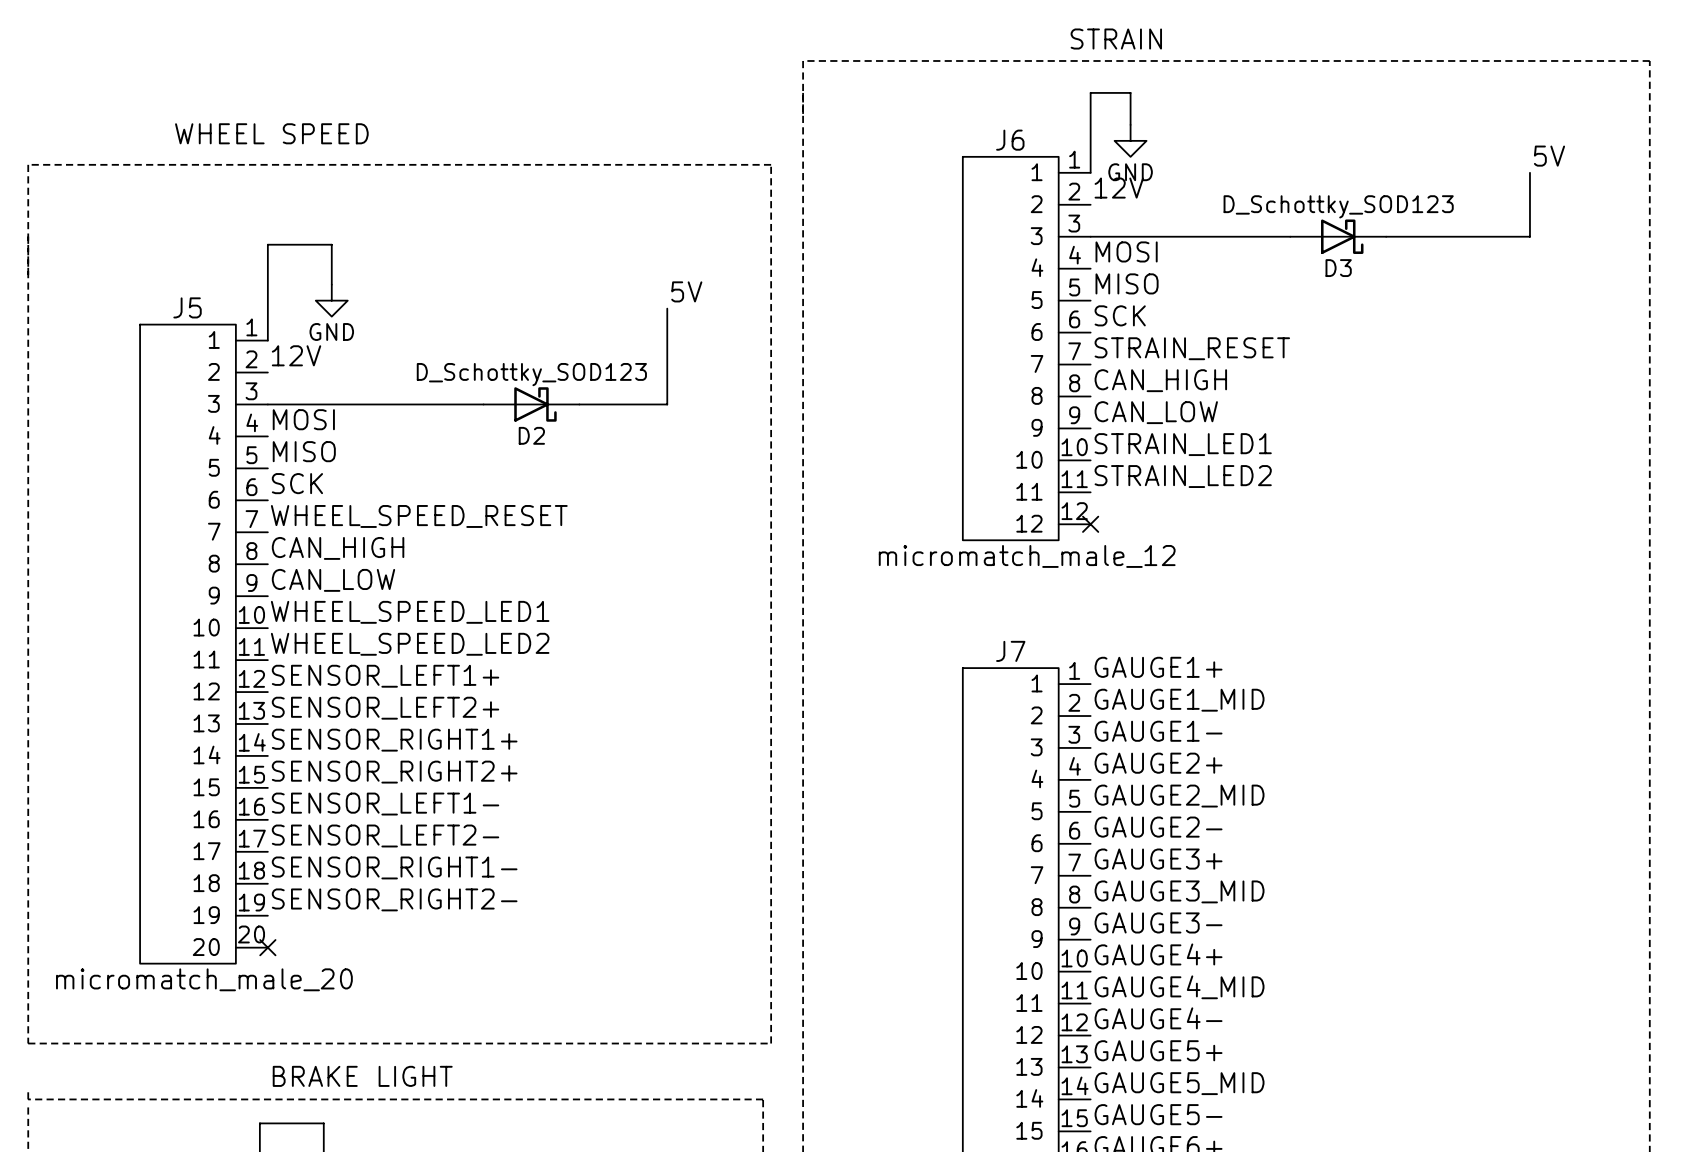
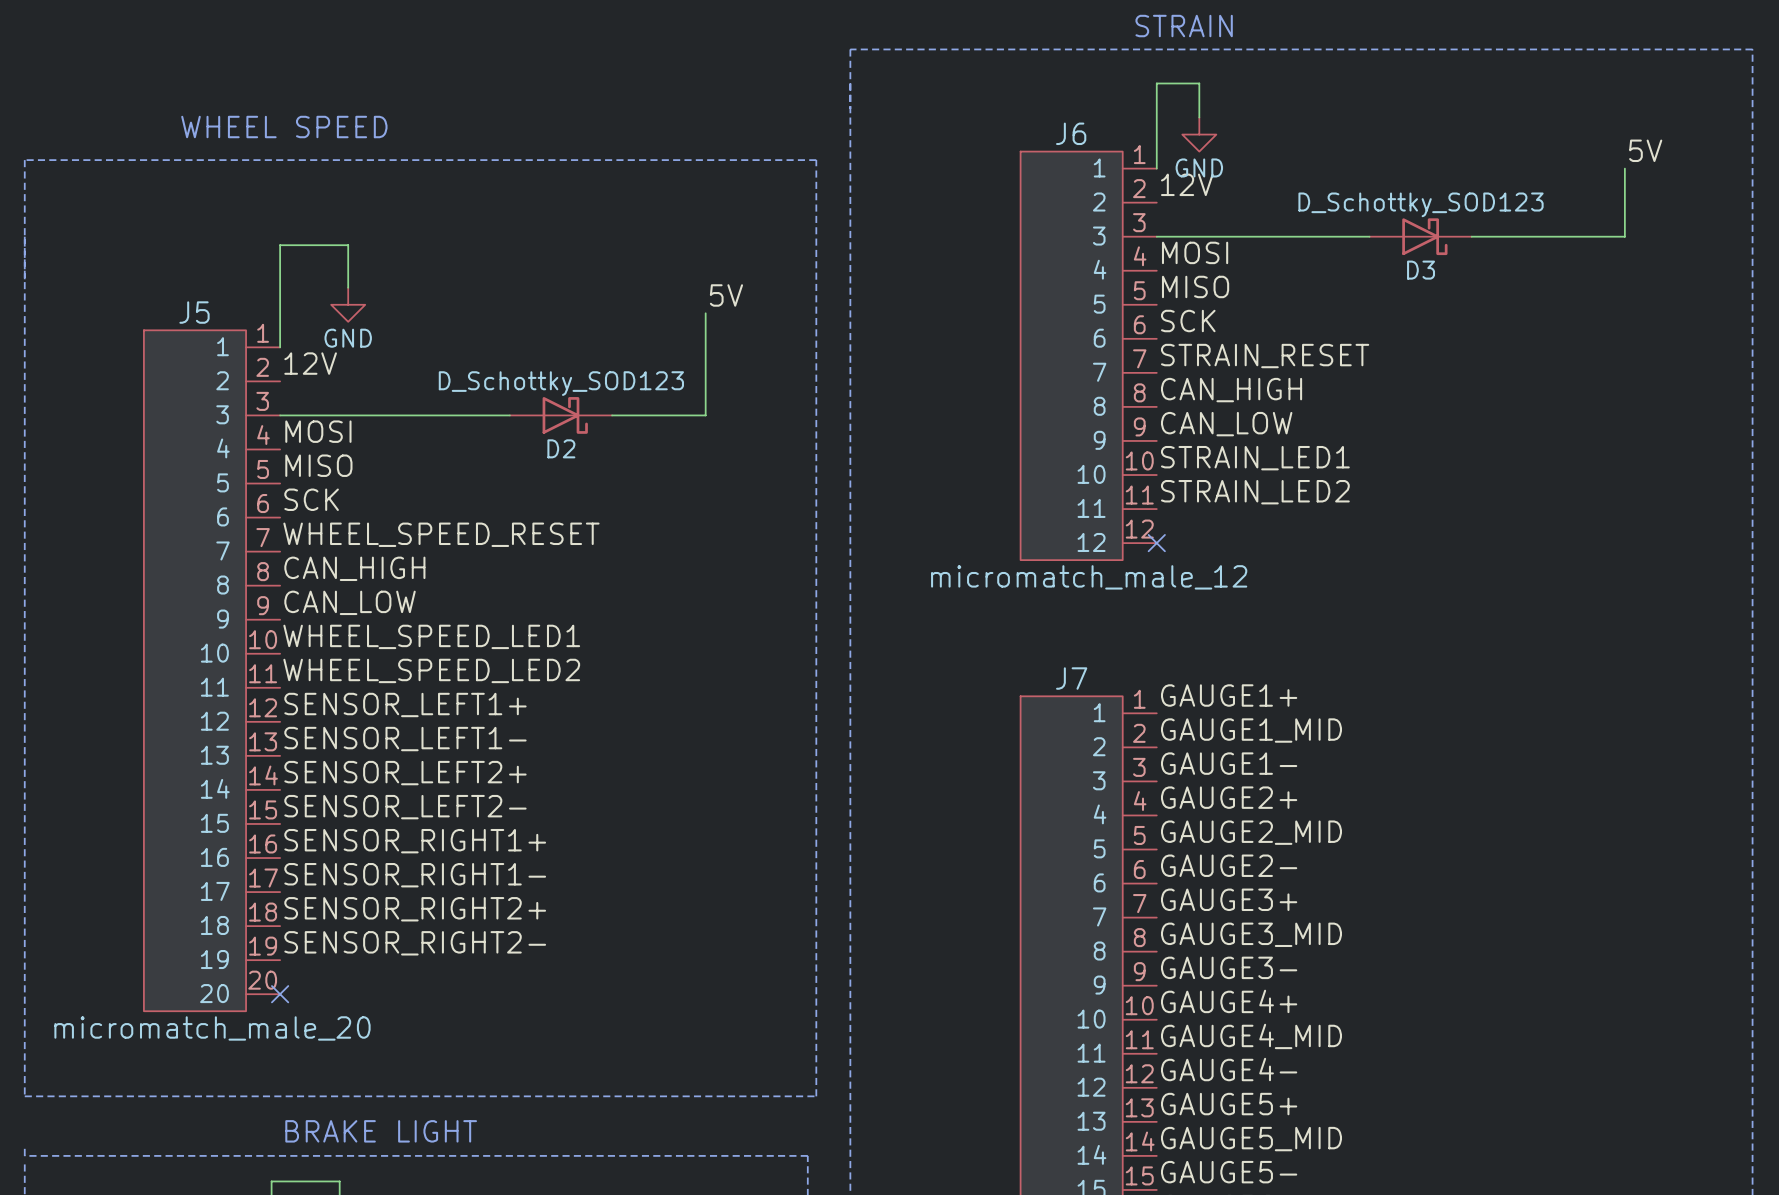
label: SENSOR_LEFT2+ (385, 708) -> SENSOR_LEFT1- (405, 739)
label: SENSOR_RIGHT1+ (394, 740) -> SENSOR_LEFT2+ (405, 773)
label: SENSOR_RIGHT2+ (394, 772) -> SENSOR_LEFT2- (405, 807)
label: SENSOR_LEFT1- (385, 804) -> SENSOR_RIGHT1+ (415, 841)
label: SENSOR_LEFT2- (385, 835) -> SENSOR_RIGHT1- (415, 875)
label: SENSOR_RIGHT1- (394, 867) -> SENSOR_RIGHT2+ (415, 909)

